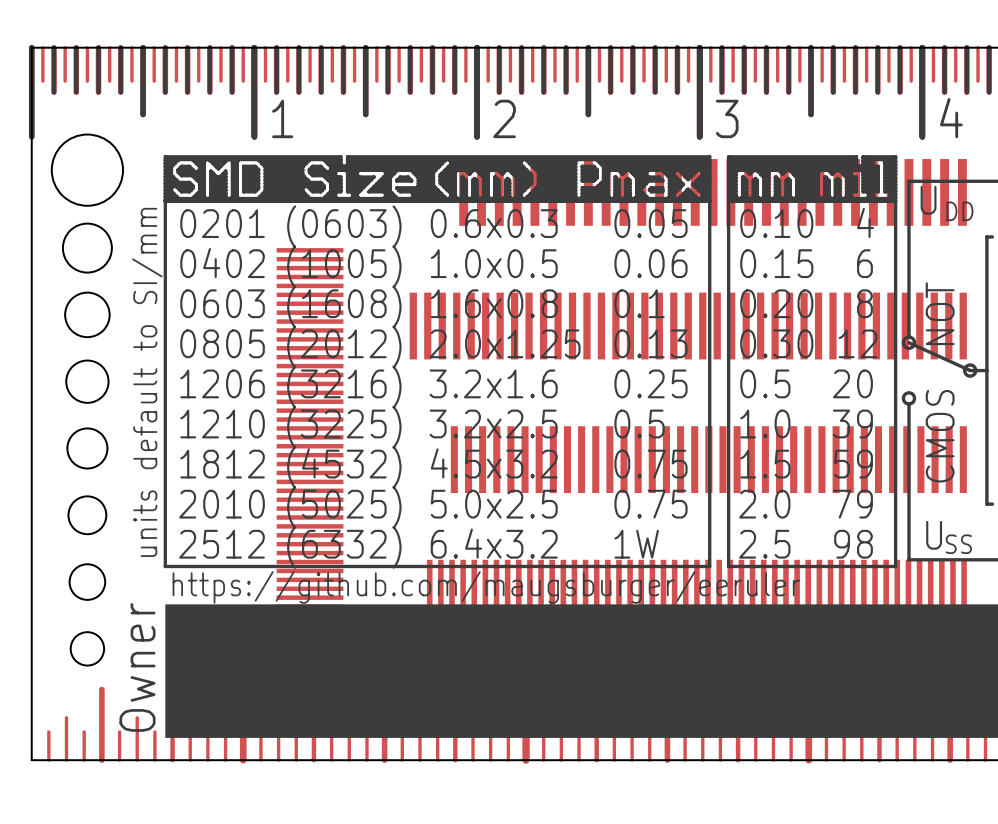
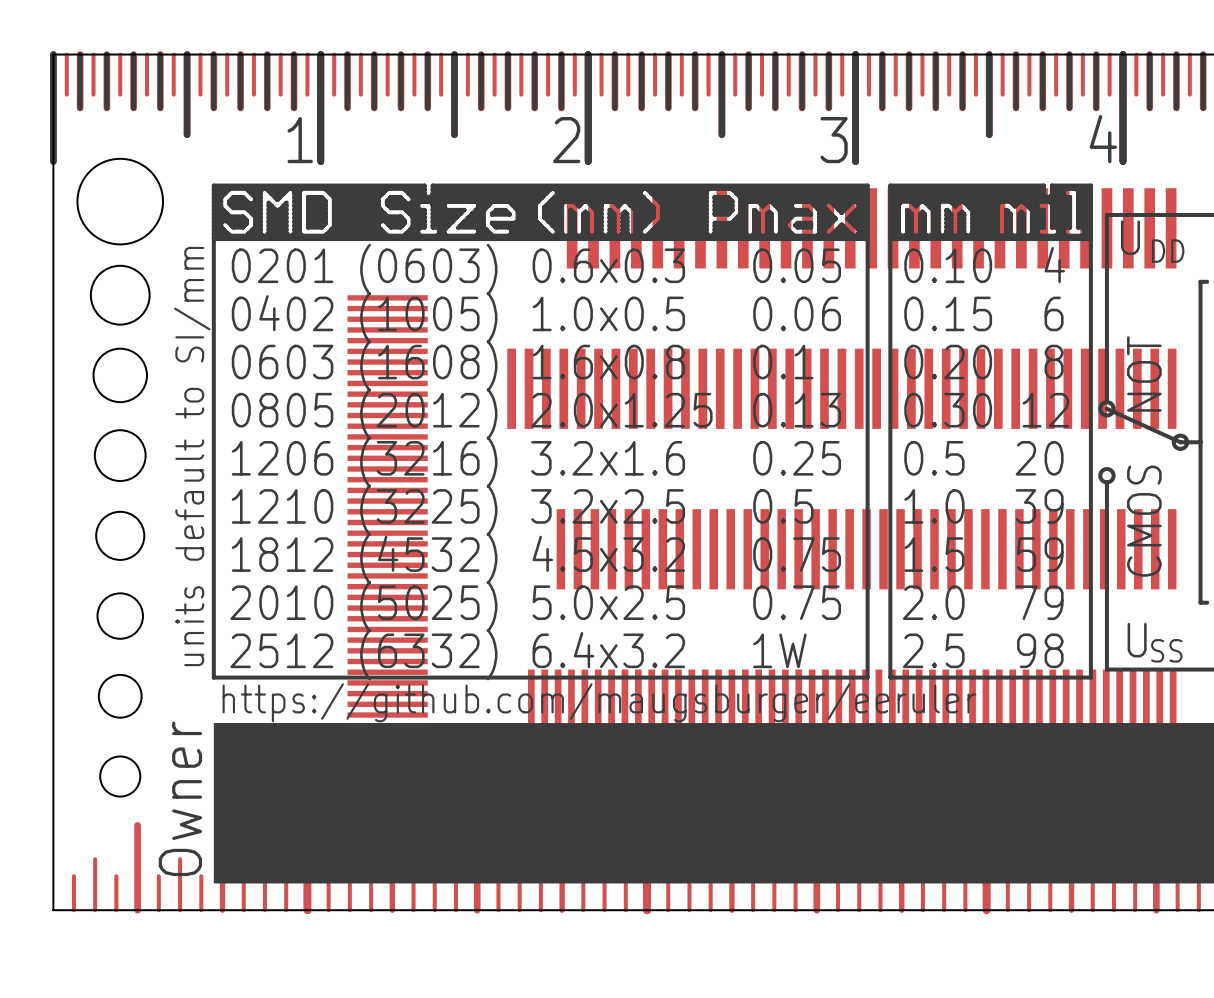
text position: 1 (282, 118) -> 1 (300, 140)
text position: 2 (504, 118) -> 2 (566, 140)
text position: 3 (727, 118) -> 3 (834, 140)
text position: 4 (951, 118) -> 4 (1103, 139)

